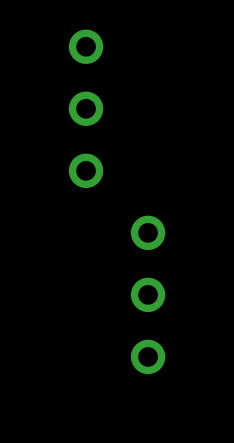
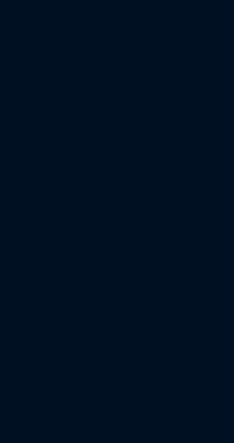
part: (86, 46) -> none
part: (86, 108) -> none
part: (86, 170) -> none
part: (148, 232) -> none
part: (148, 294) -> none
part: (148, 356) -> none

